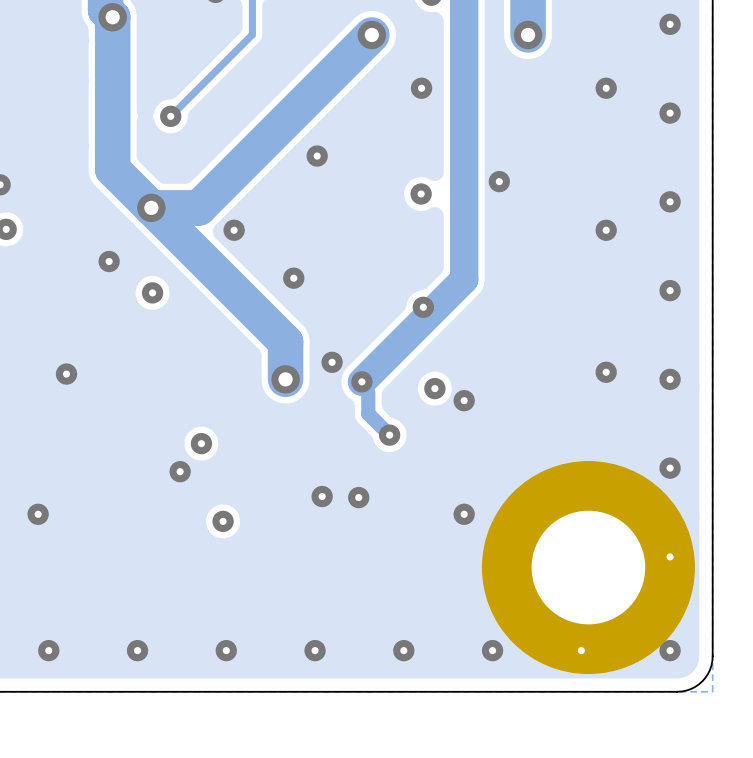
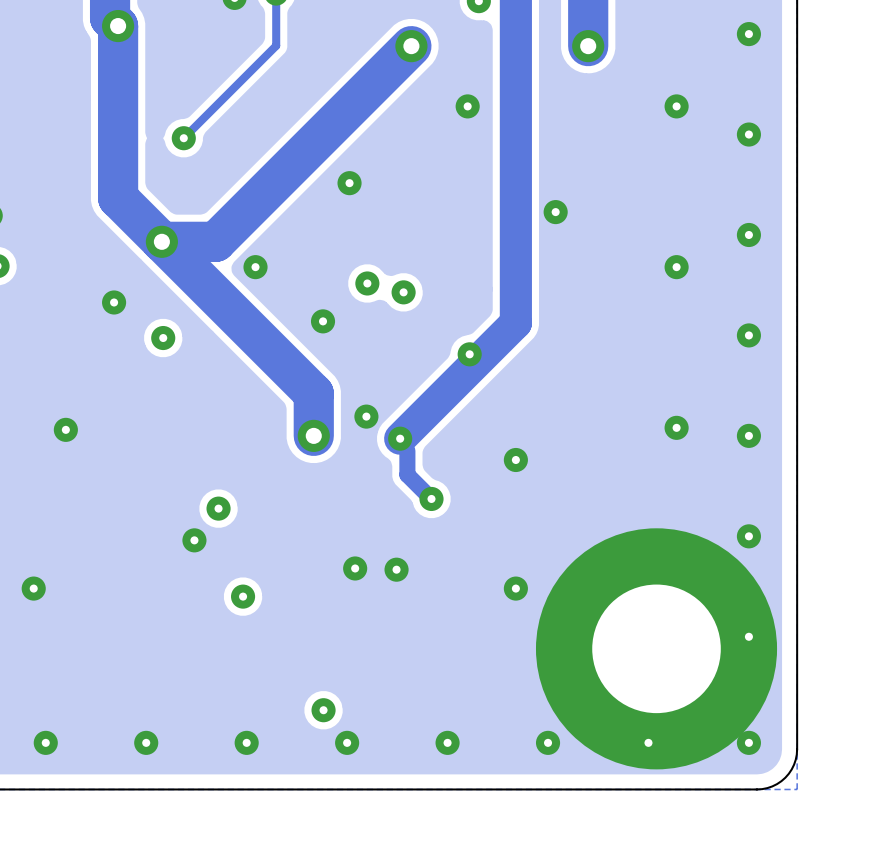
via: (421, 194) -> none
via: none -> (367, 283)
via: none -> (403, 292)
via: (434, 388) -> none
via: none -> (323, 710)

